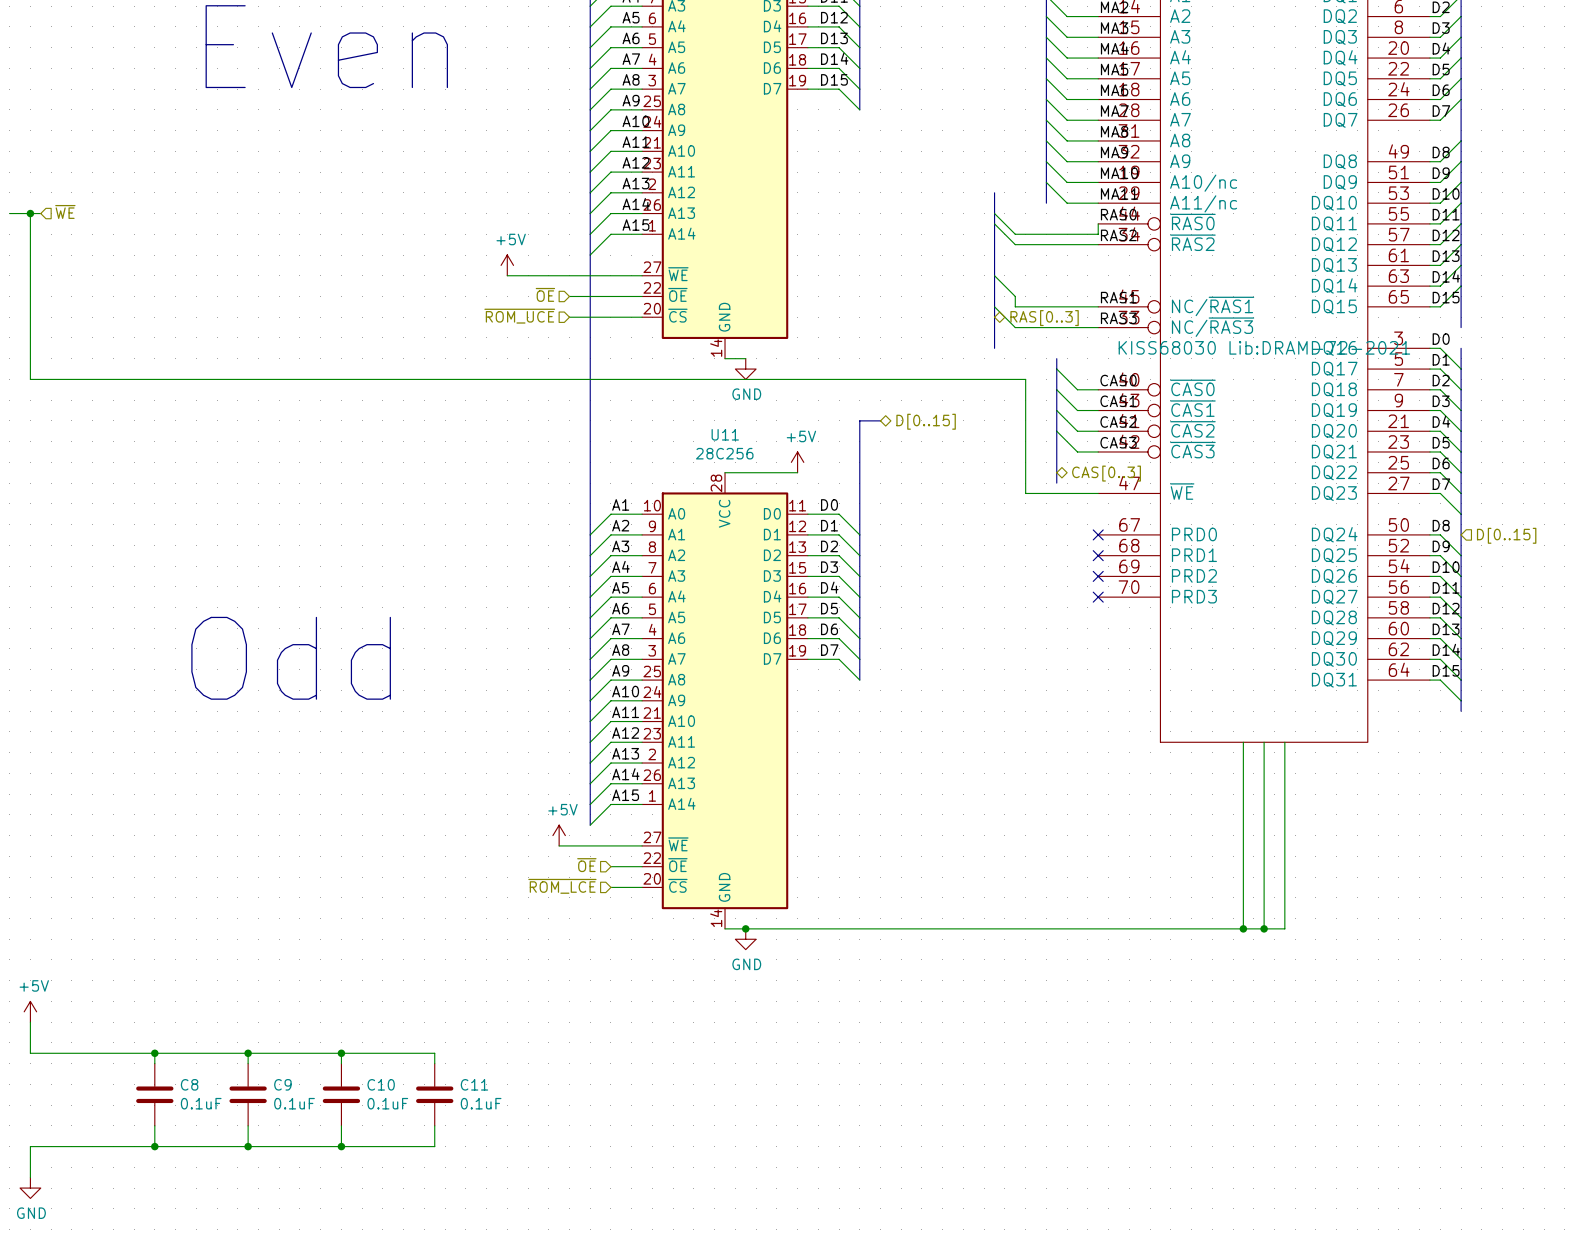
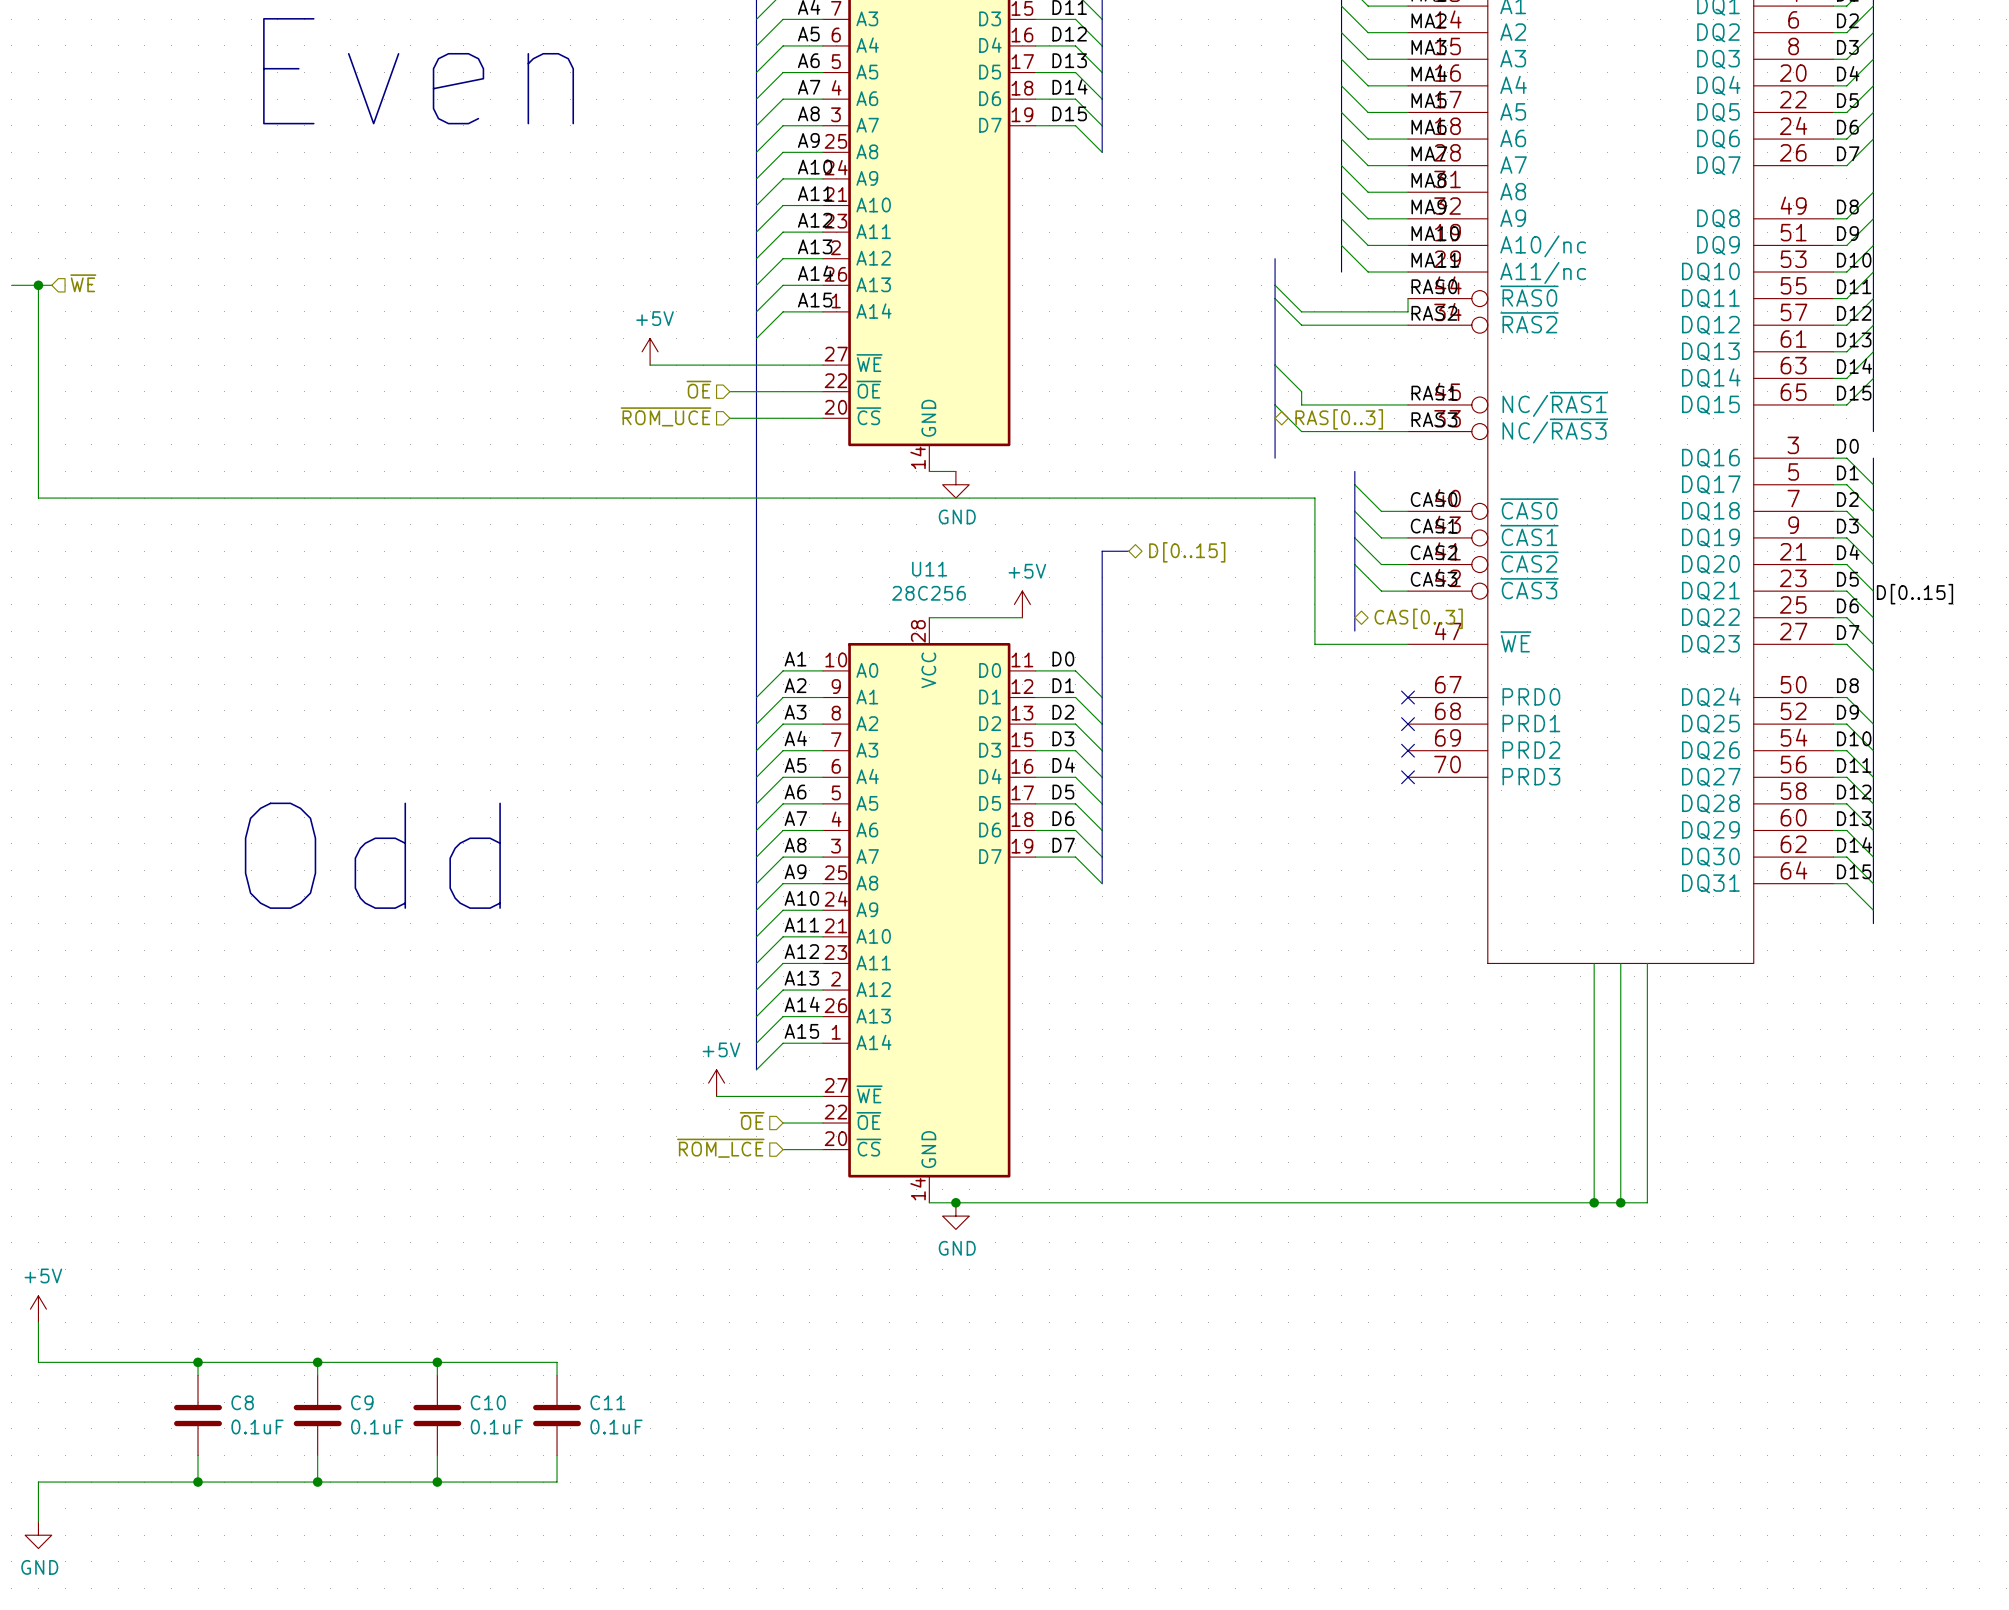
part text: KISS68030 Lib:DRAM-72-2021 (1264, 347) -> none
label: none -> D[0..15] (1914, 594)
hierarchical label: D[0..15] (1506, 535) -> none

